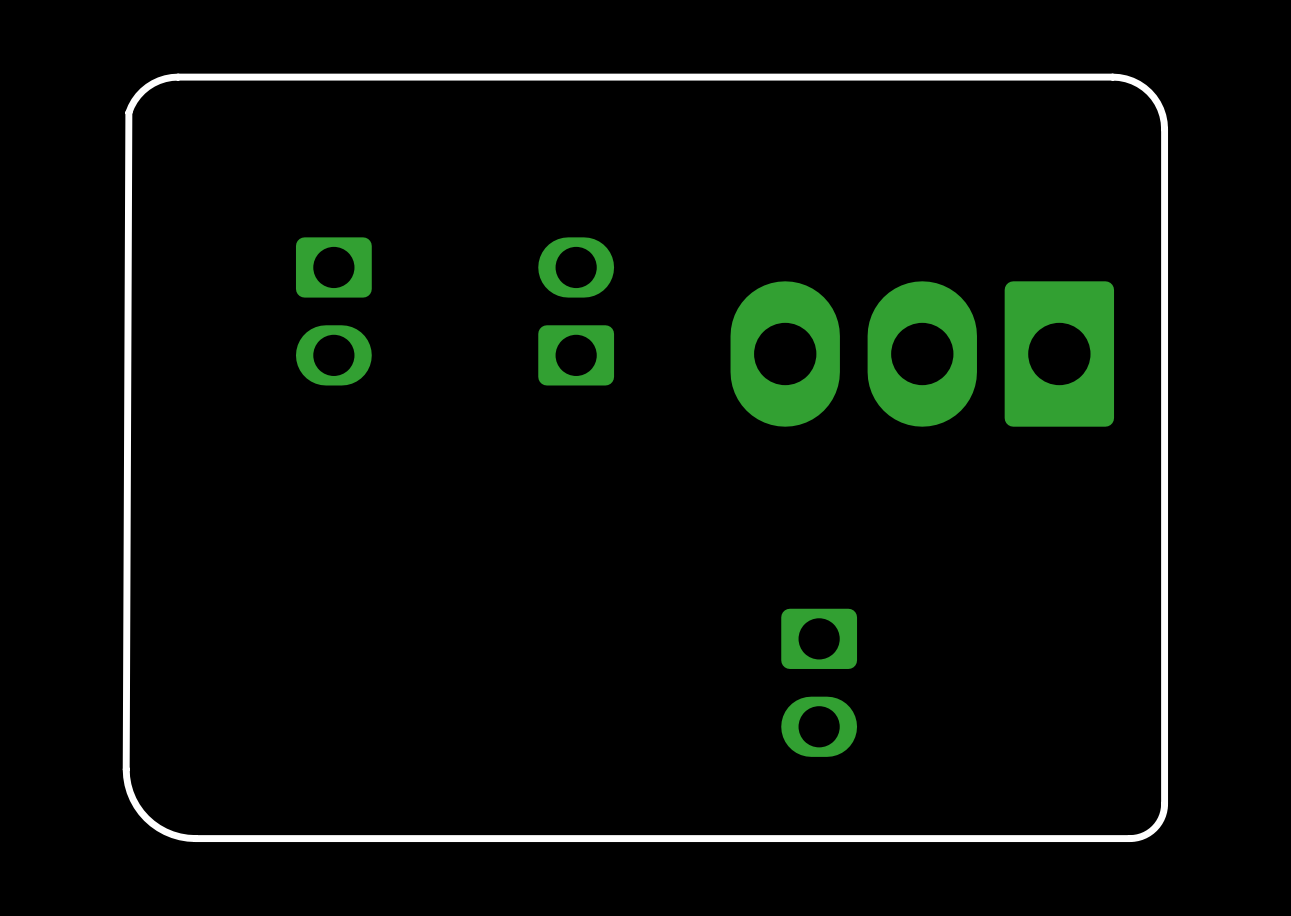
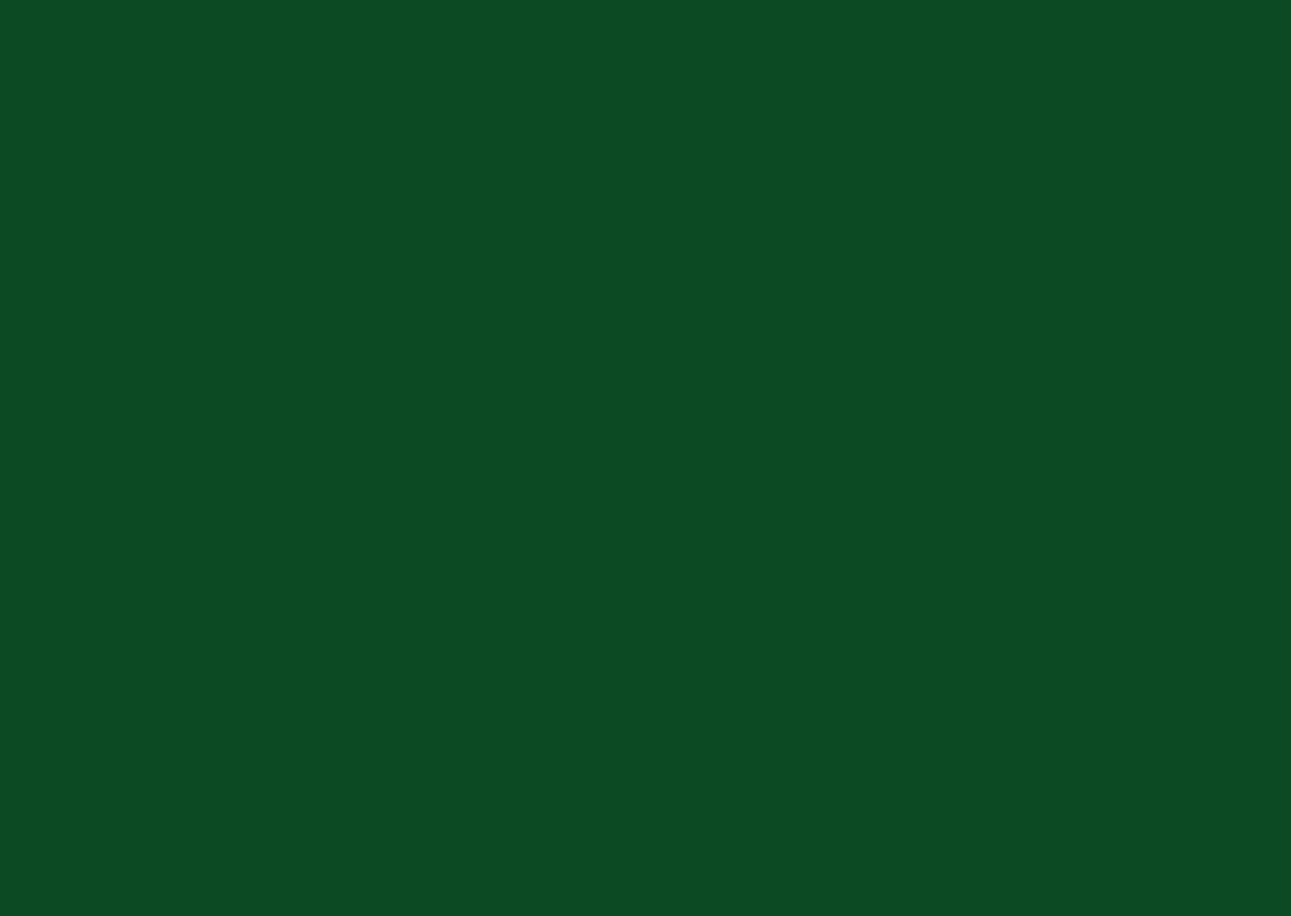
board edge: (1112, 77) (178, 77) (165, 78) (147, 86) (134, 100) (128, 112) (126, 769) (130, 792) (141, 812) (152, 823) (165, 831) (180, 836) (195, 838) (1129, 838) (1141, 836) (1151, 831) (1161, 818) (1164, 803) (1164, 129) (1160, 109) (1149, 92) (1132, 81) (1112, 77) -> none
part: (333, 311) -> none
part: (576, 311) -> none
part: (922, 354) -> none
part: (819, 682) -> none

